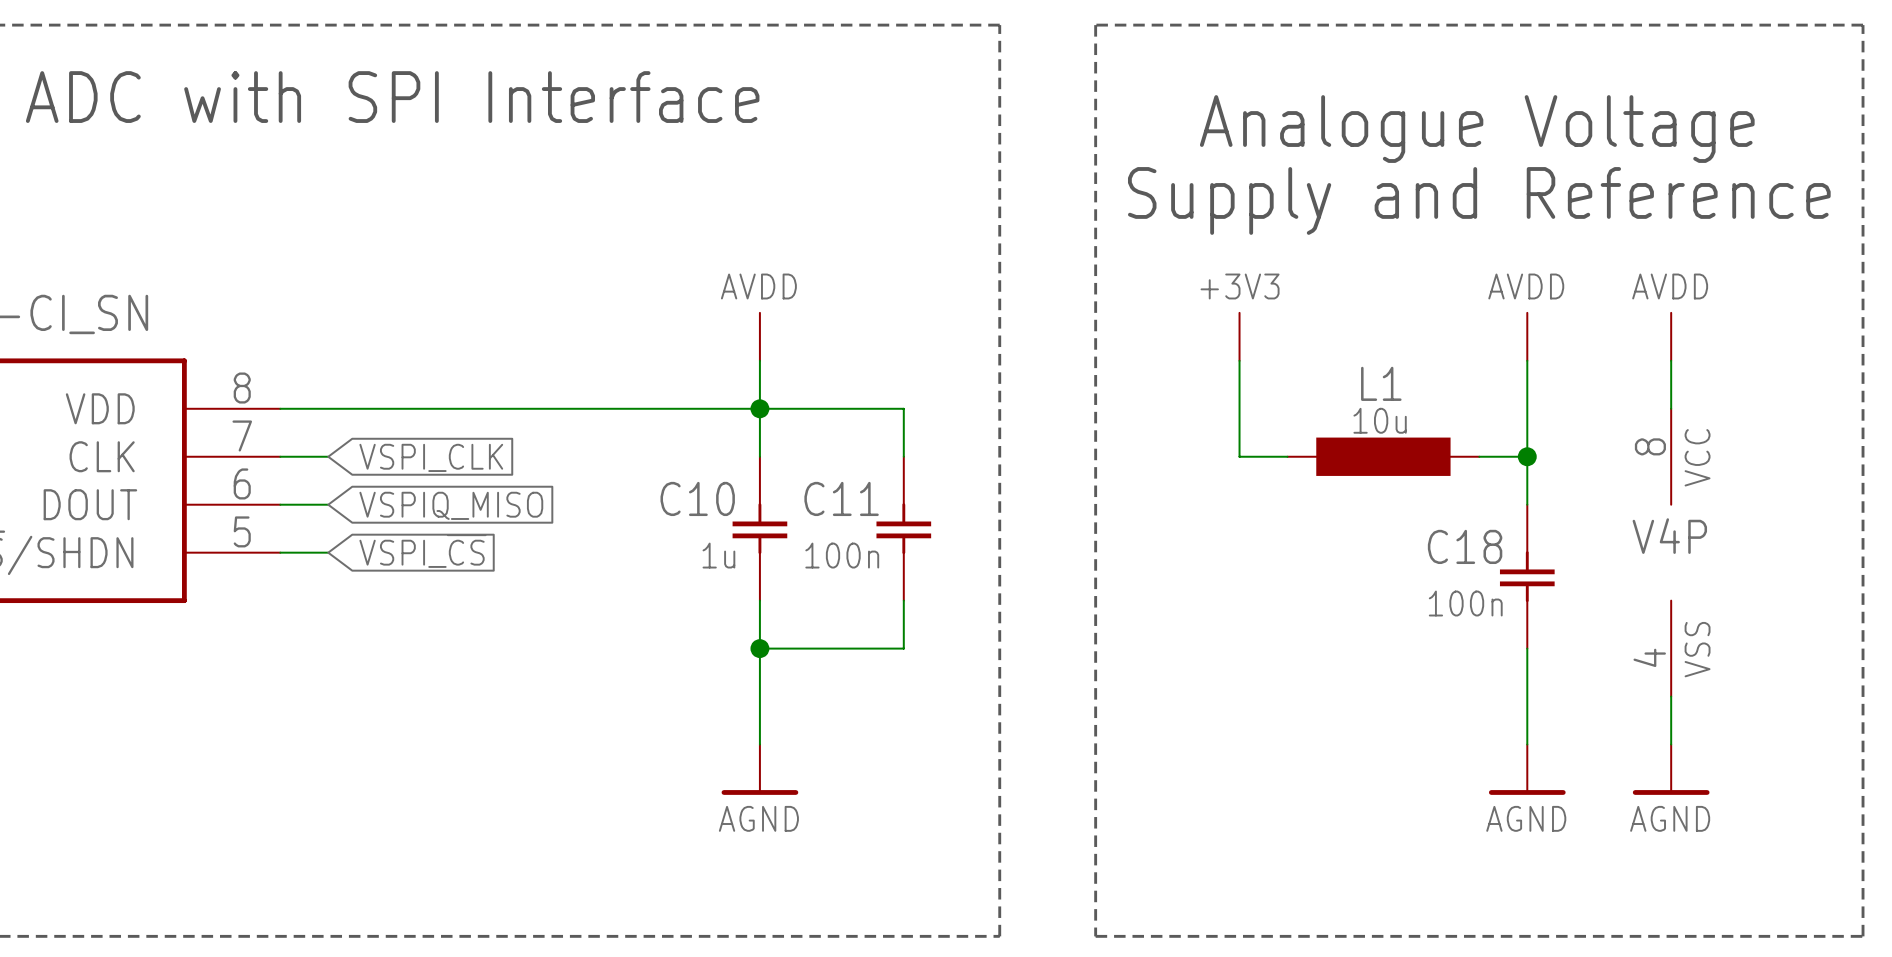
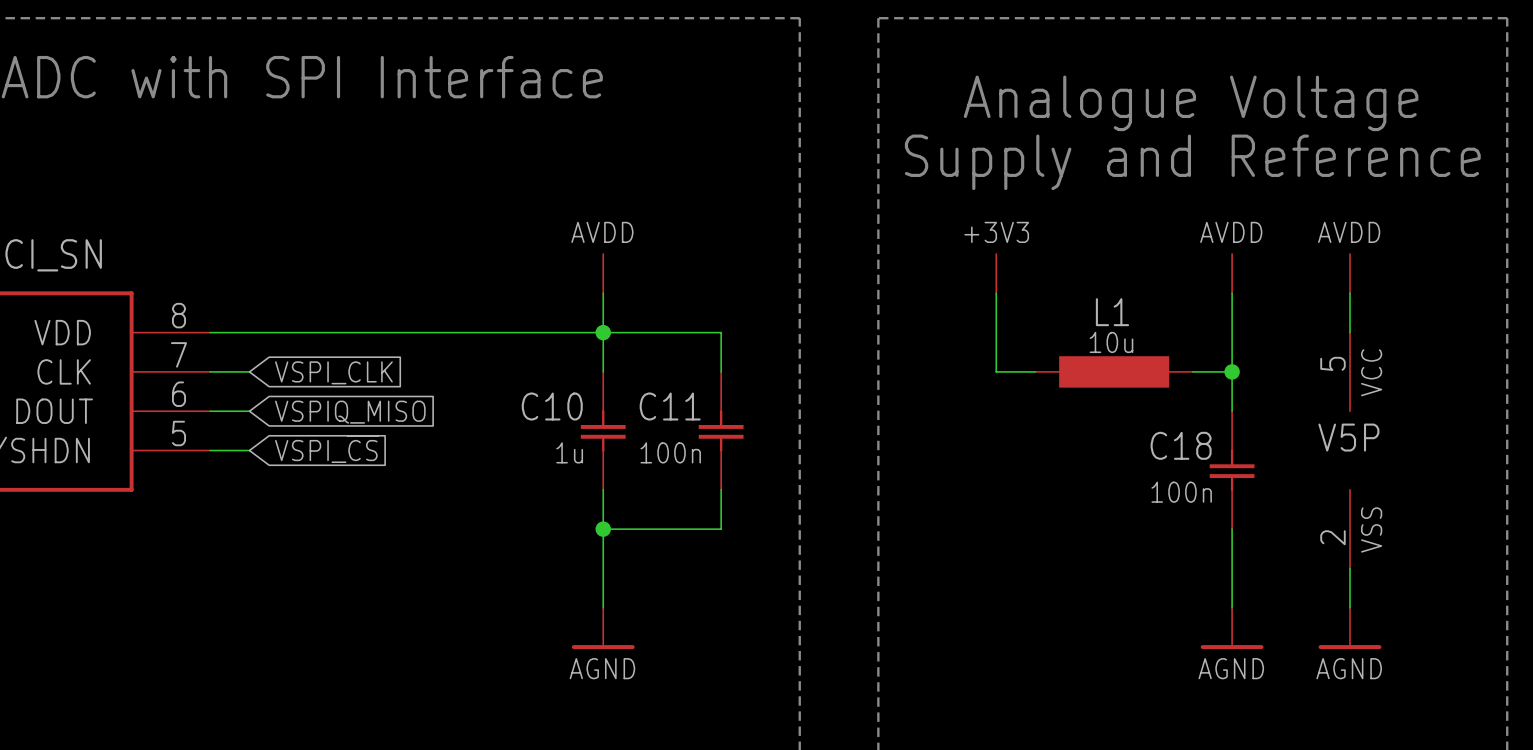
V4P pin number: 8 (1650, 446) -> 5 (1332, 363)
V4P name: V4P (1669, 536) -> V5P (1348, 437)
V4P pin number: 4 (1649, 657) -> 2 (1332, 537)

